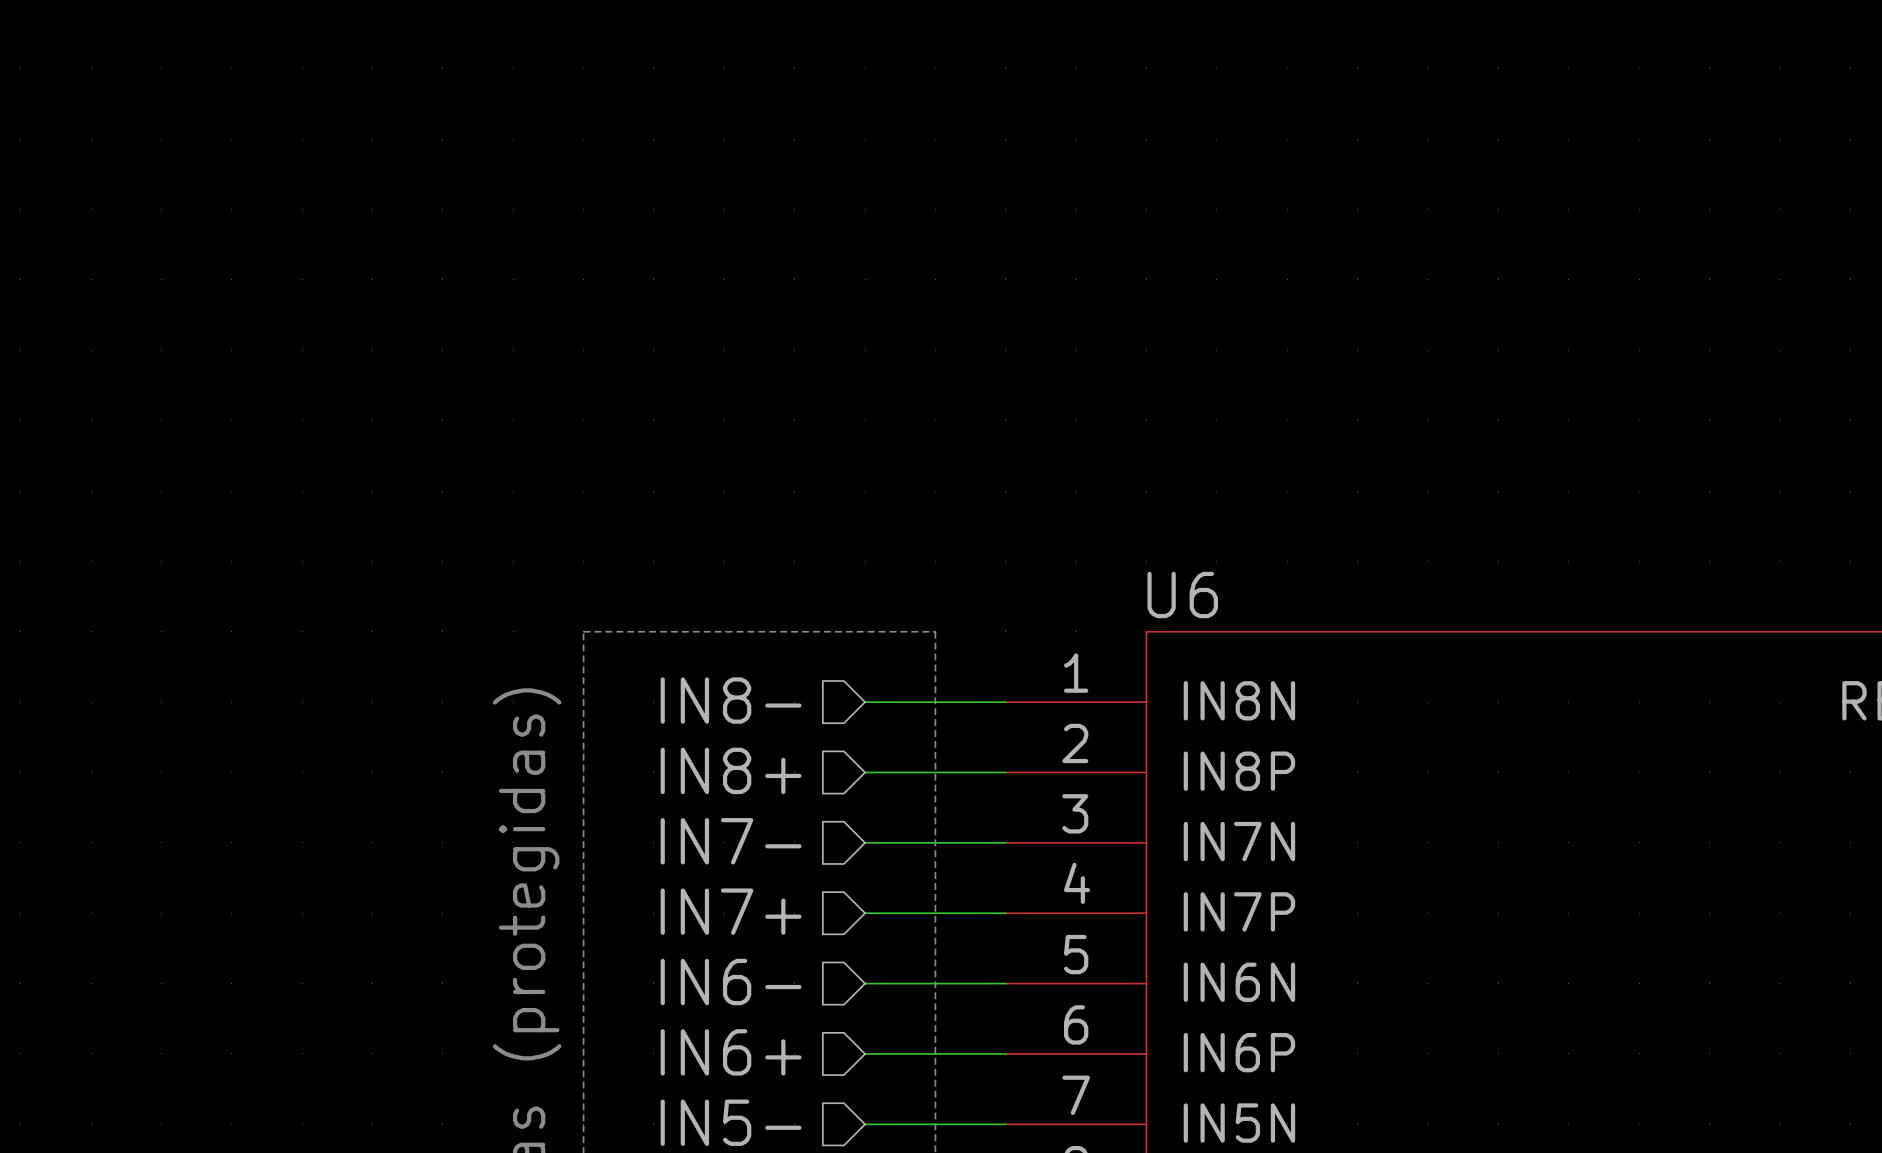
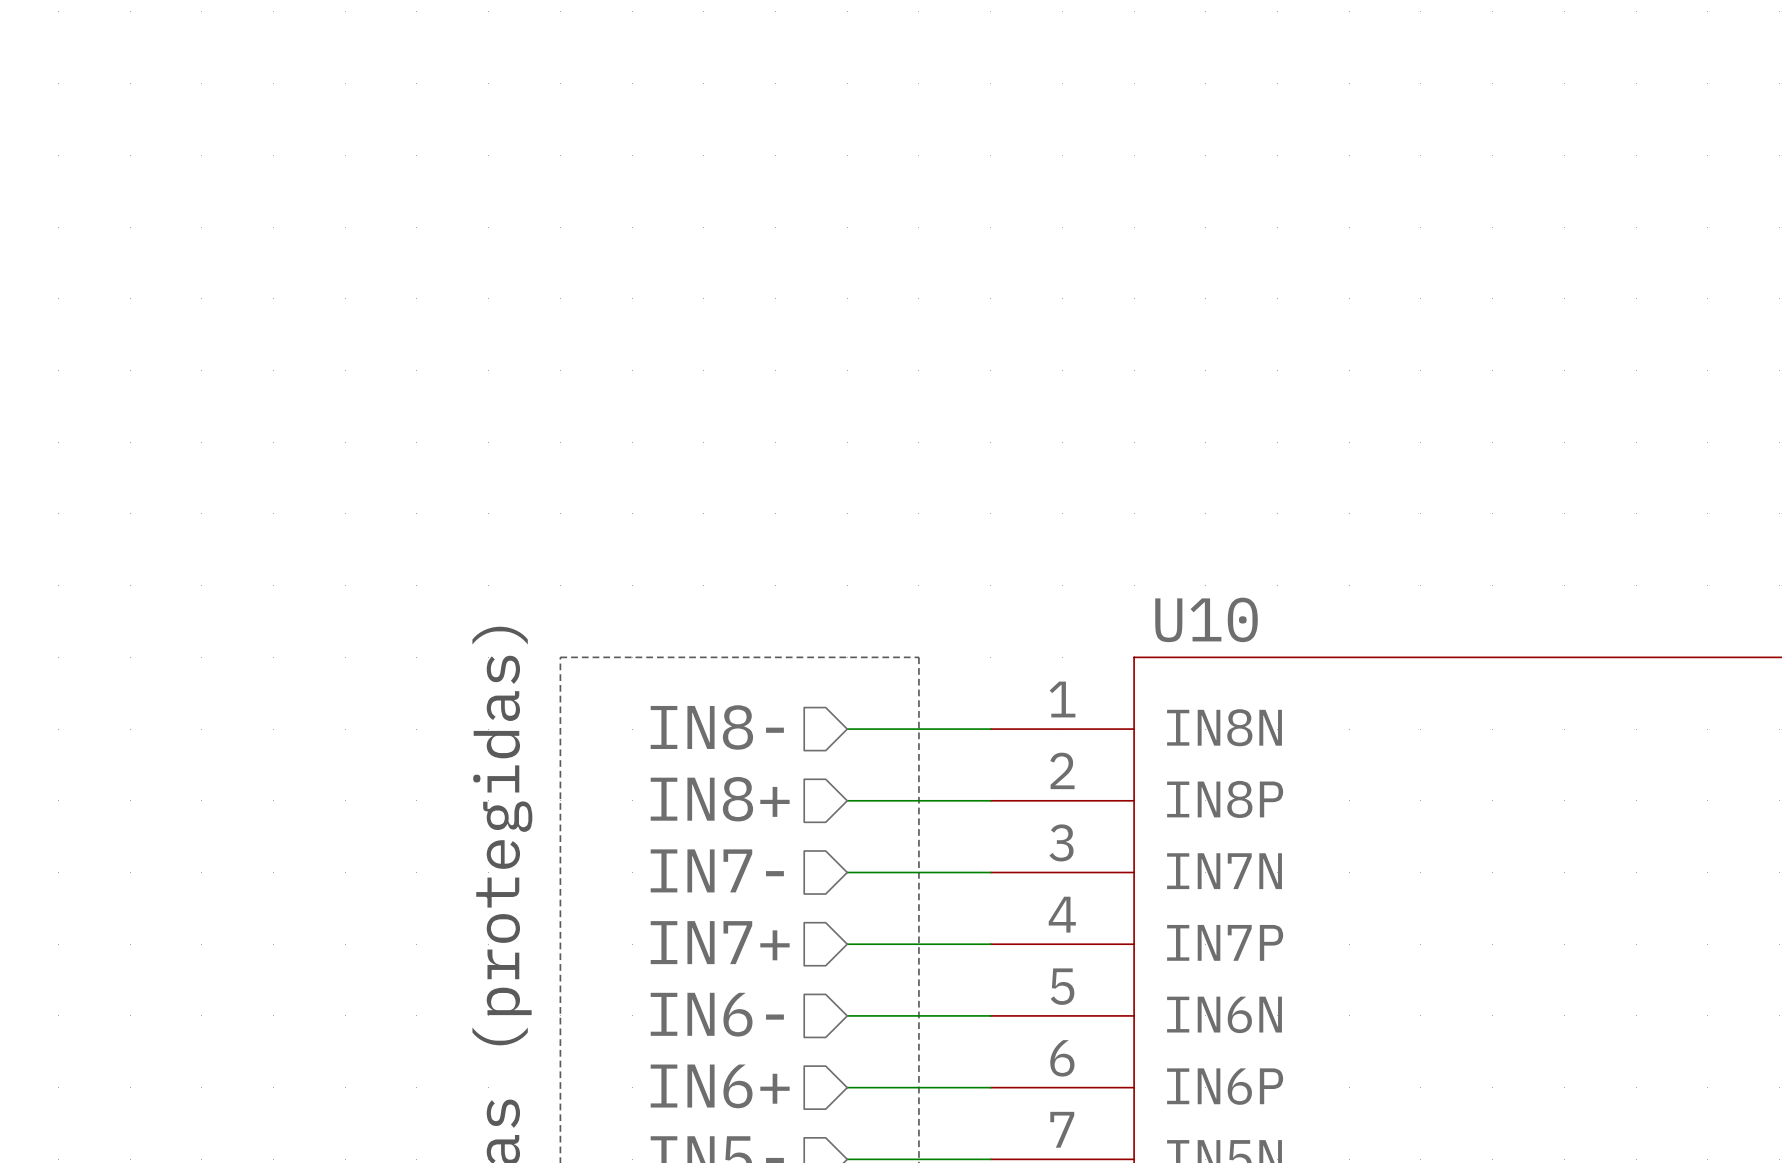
U6 name: U6 (1182, 594) -> U10 (1206, 619)

